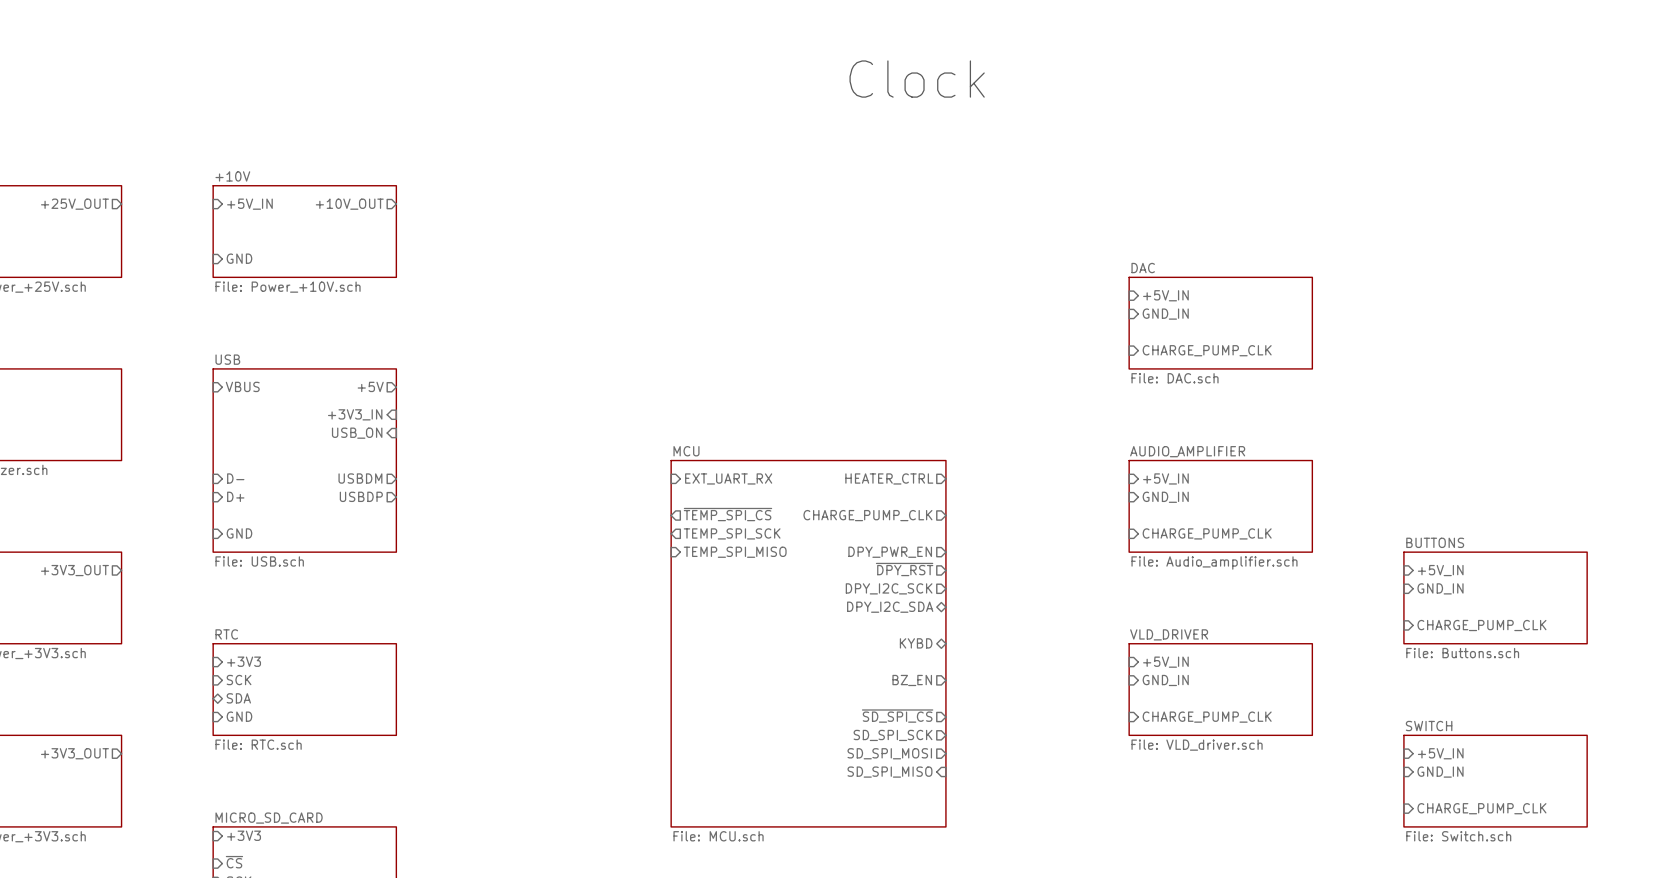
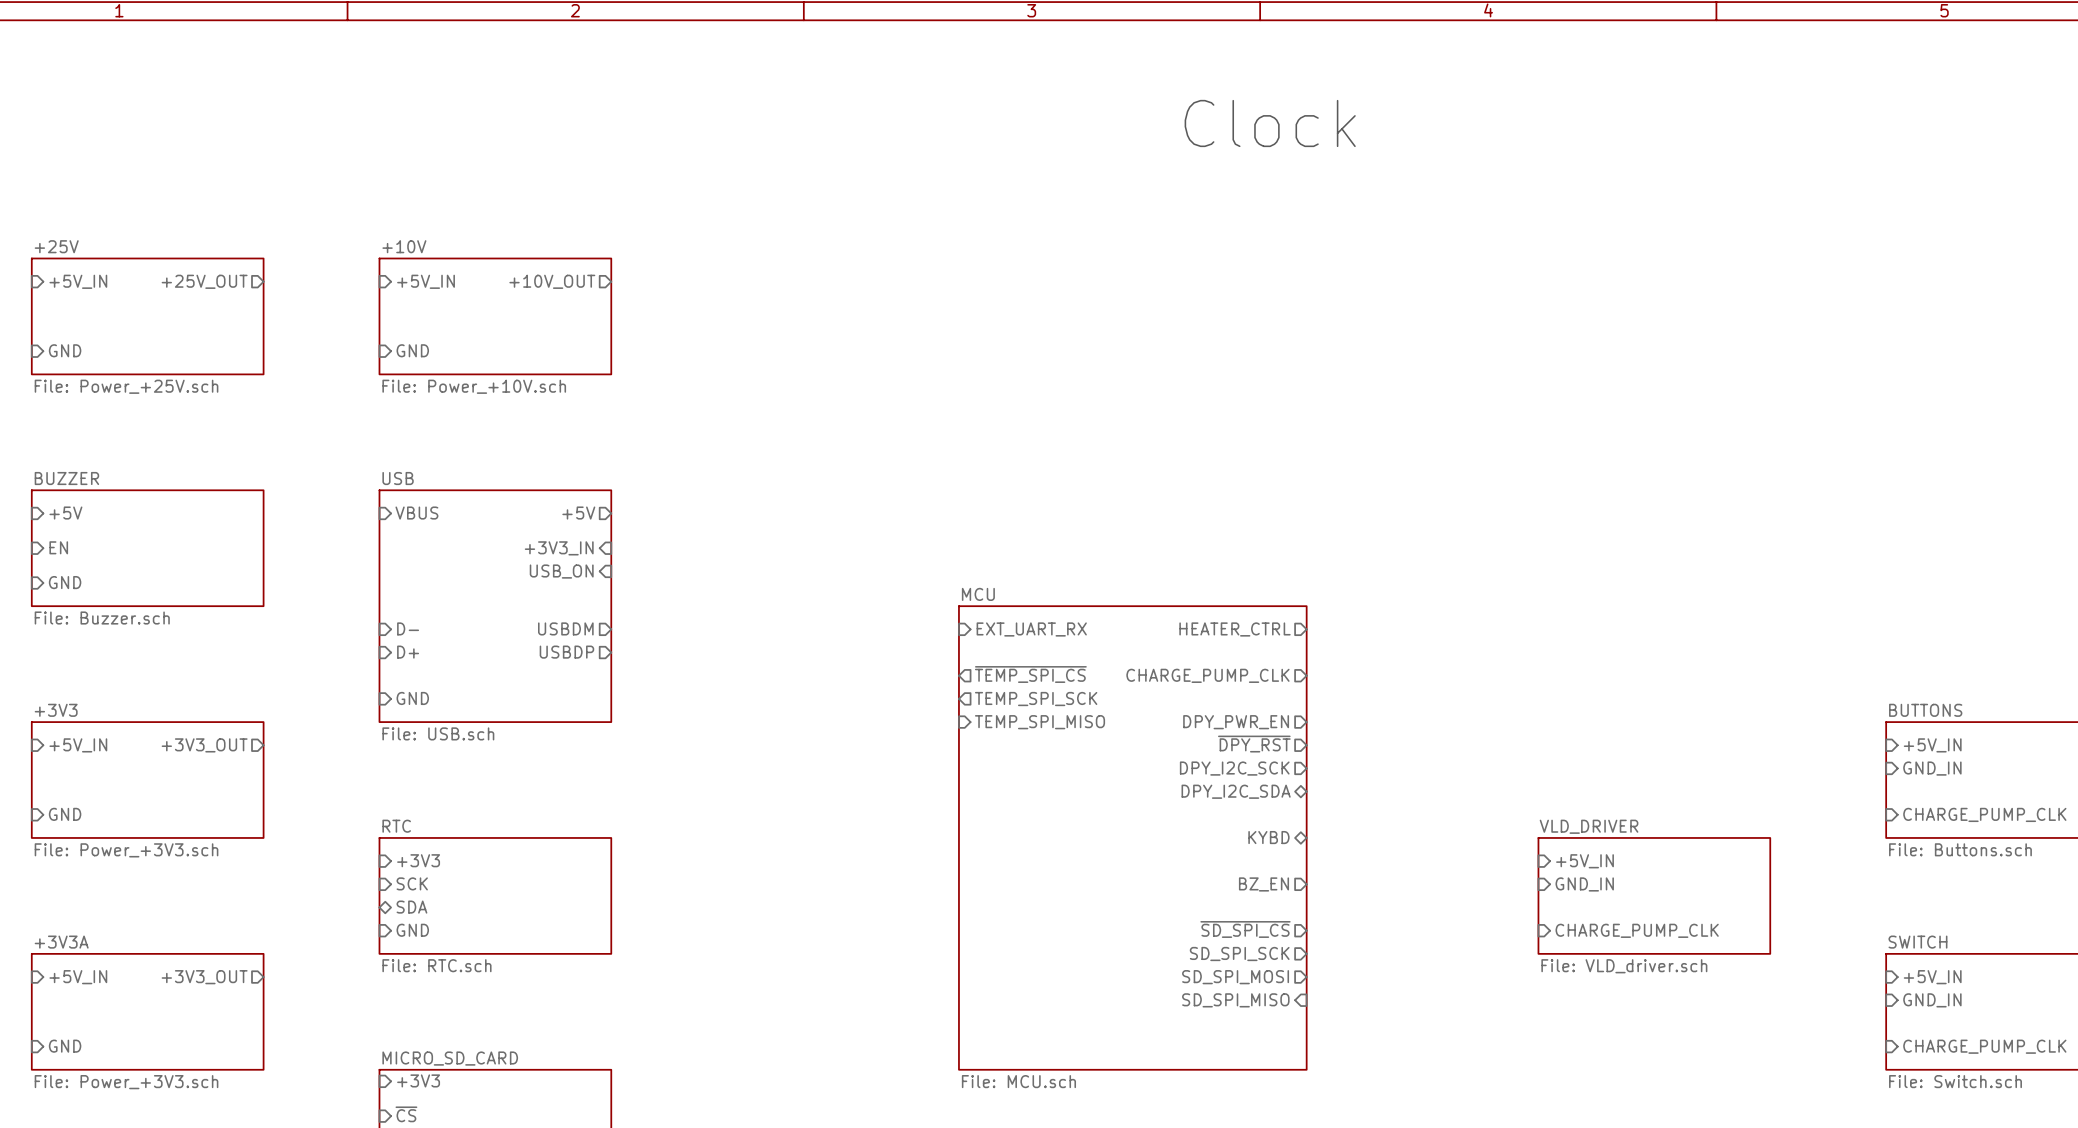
sheet pin: +5V_IN (1165, 295) -> none
sheet pin: GND_IN (1165, 314) -> none
sheet DAC: File: DAC.sch (1220, 323) -> none
sheet pin: CHARGE_PUMP_CLK (1207, 350) -> none
sheet pin: +5V_IN (1165, 478) -> none
sheet pin: GND_IN (1165, 497) -> none
sheet AUDIO_AMPLIFIER: File: Audio_amplifier.sch (1220, 506) -> none
sheet pin: CHARGE_PUMP_CLK (1207, 533) -> none

